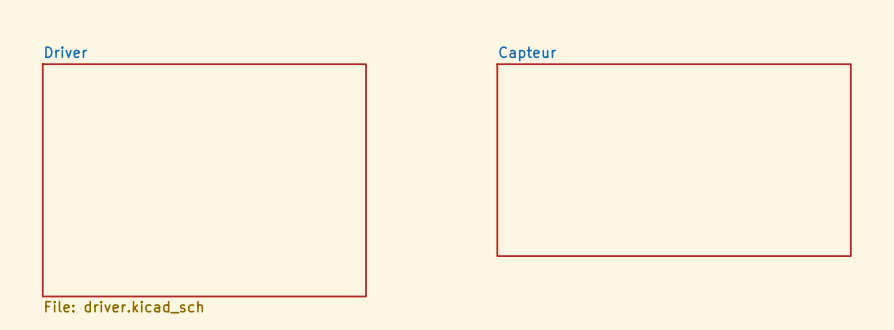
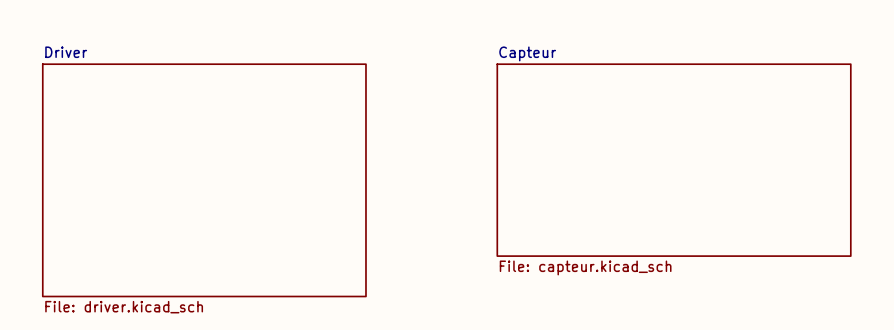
sheet Capteur value: none -> File: capteur.kicad_sch (585, 267)

